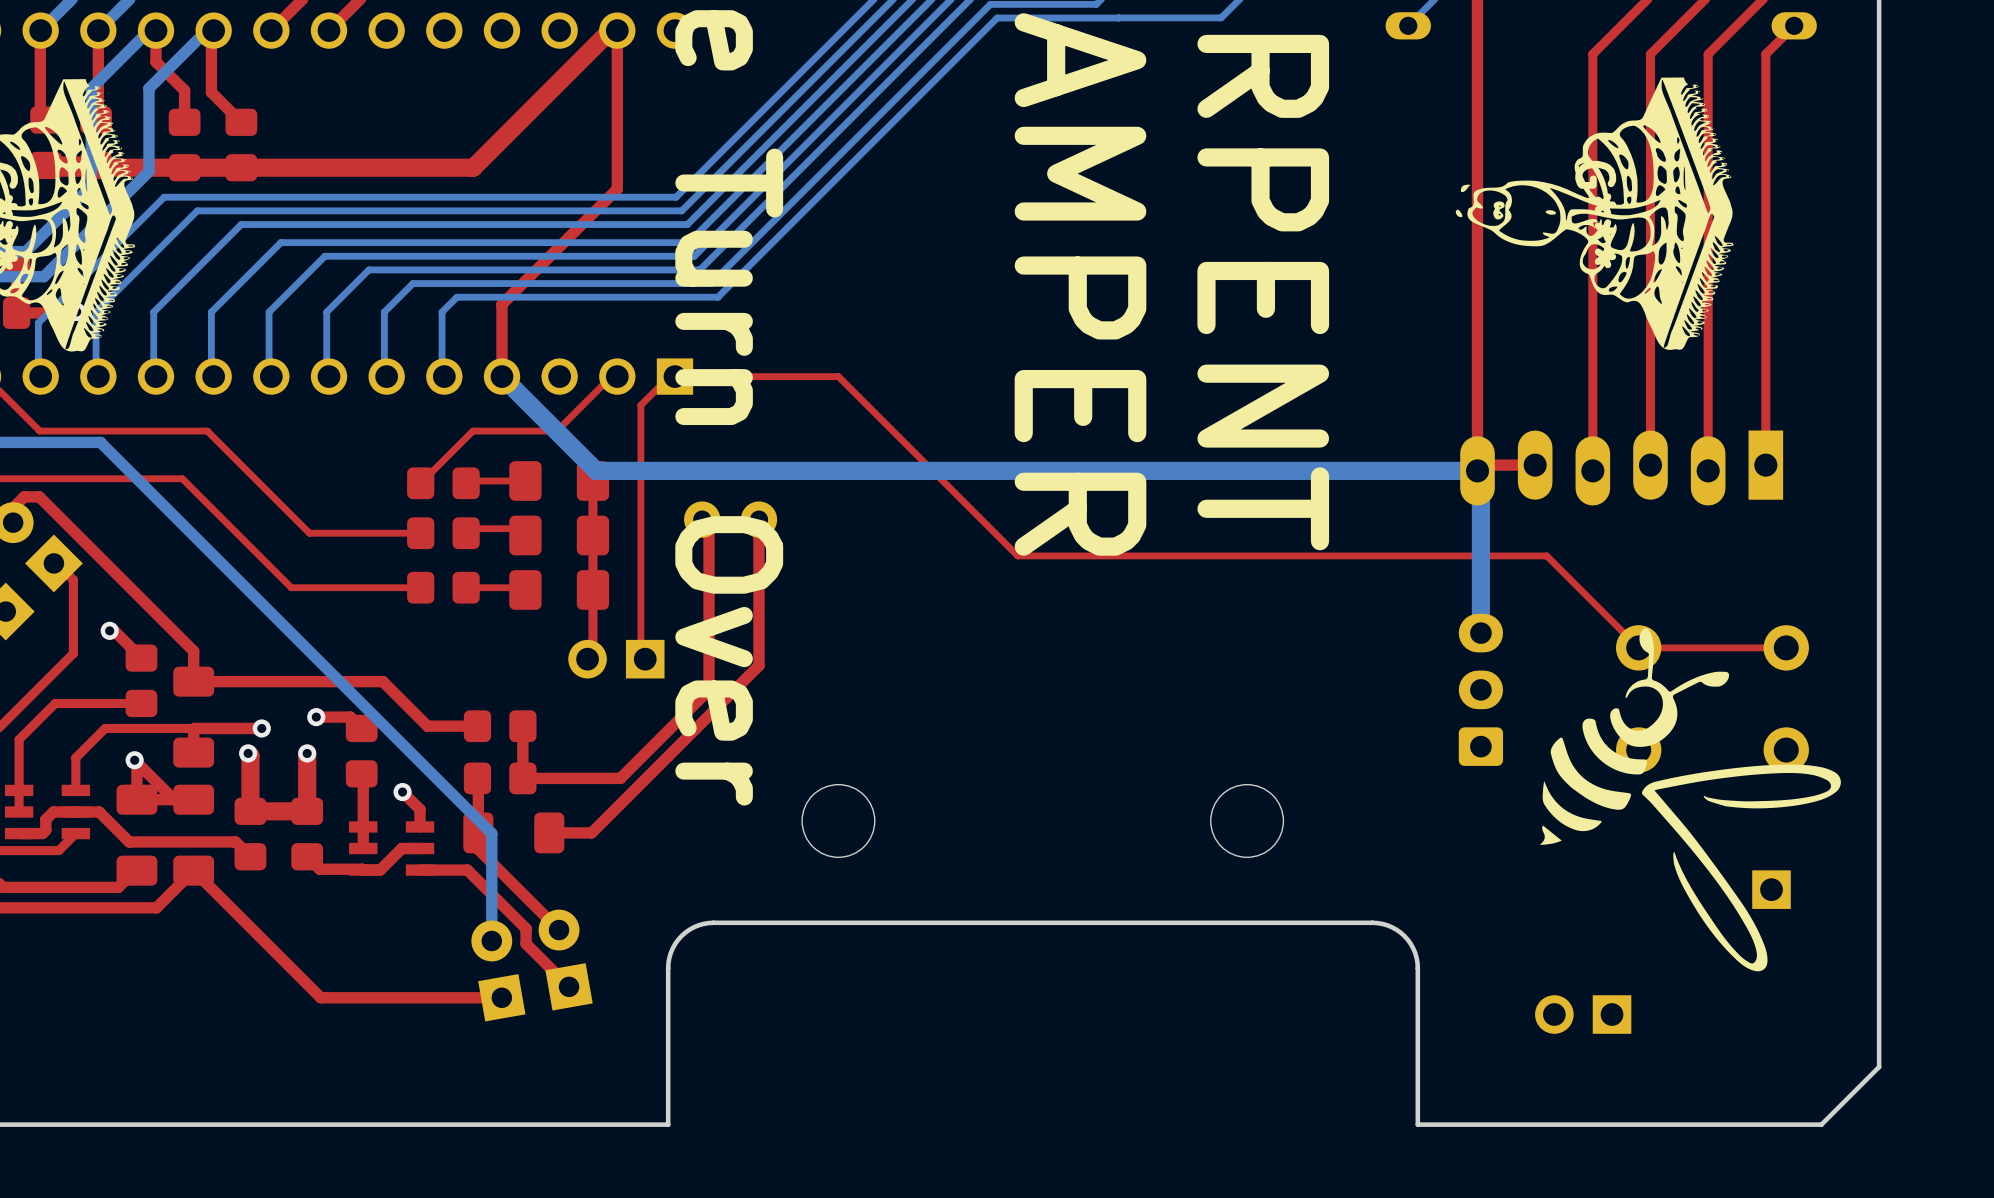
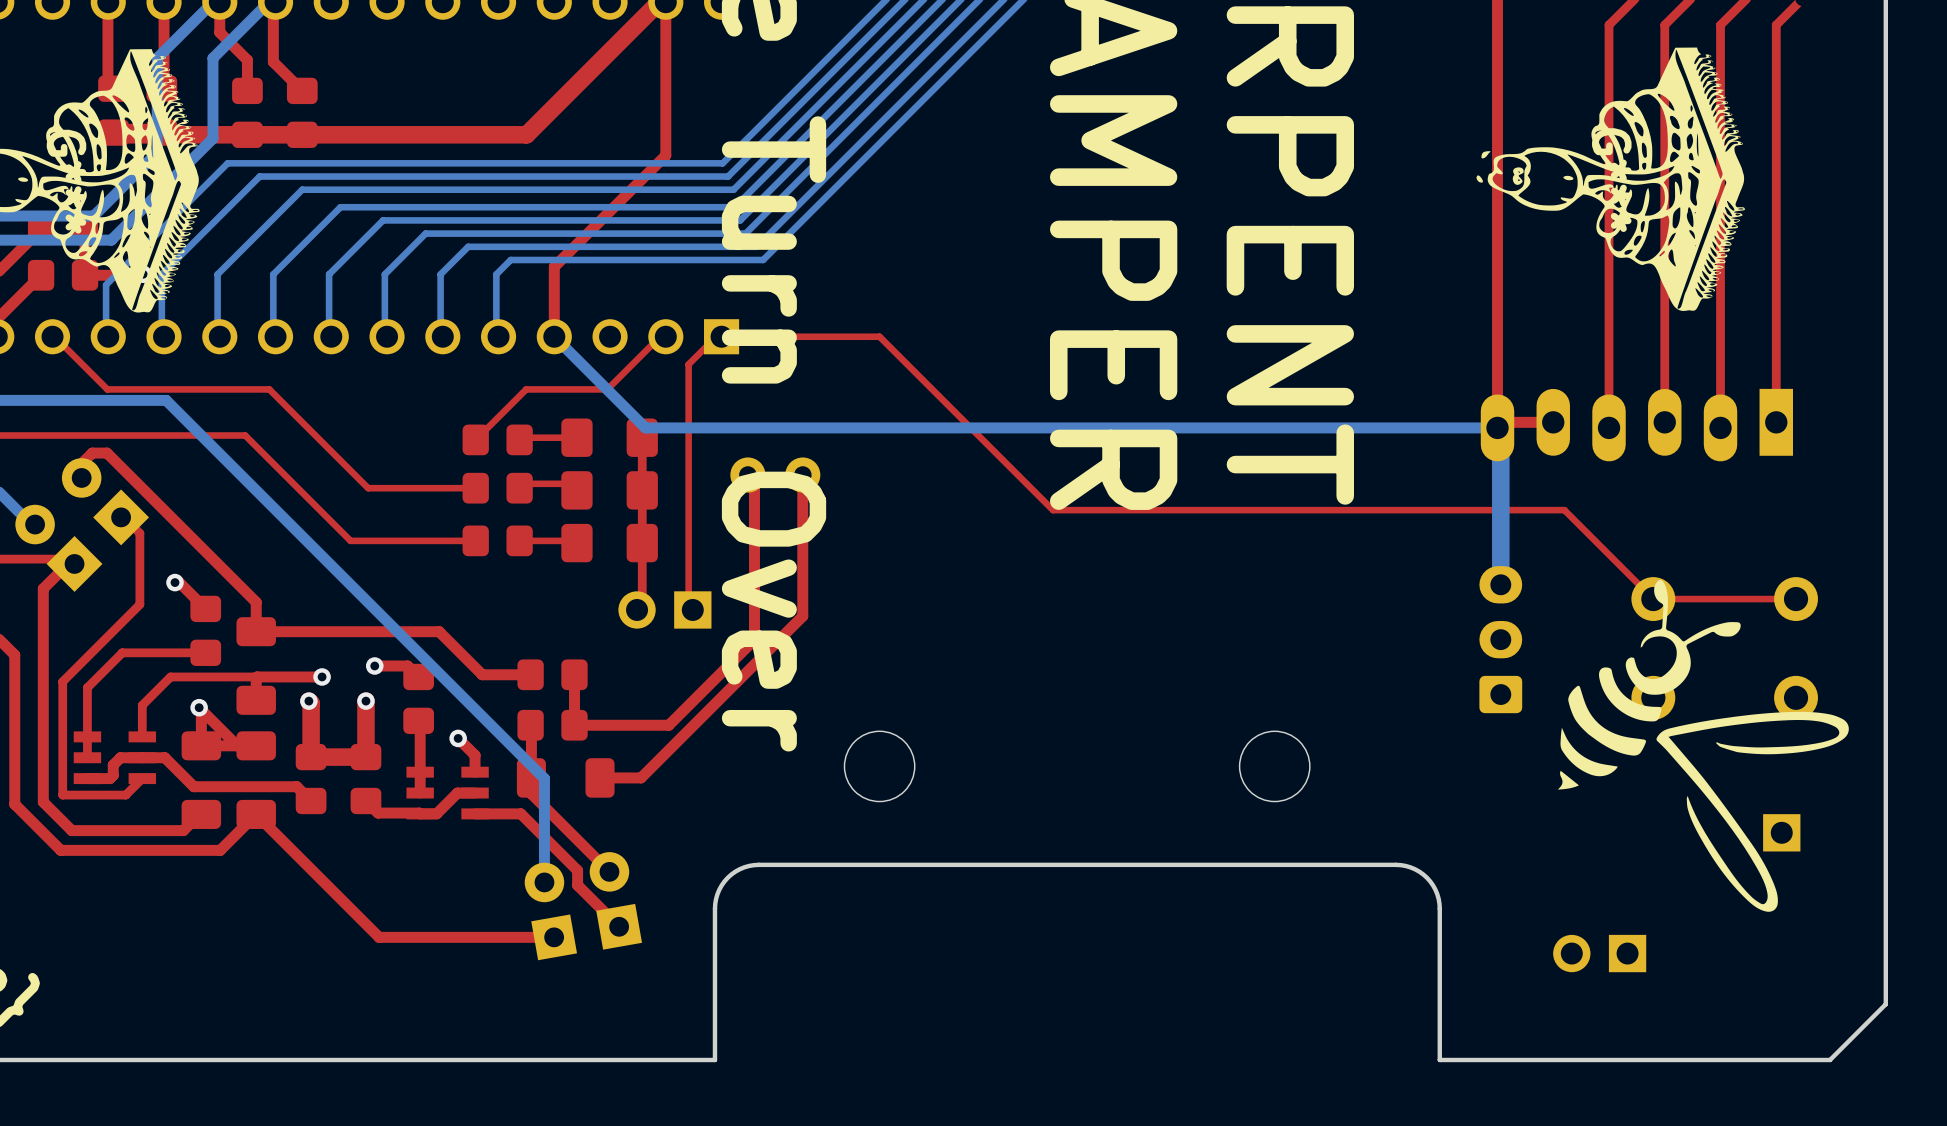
bottom track width: thick (501, 376) (596, 470) (1477, 470) -> thin (554, 336) (645, 427) (1497, 427)

